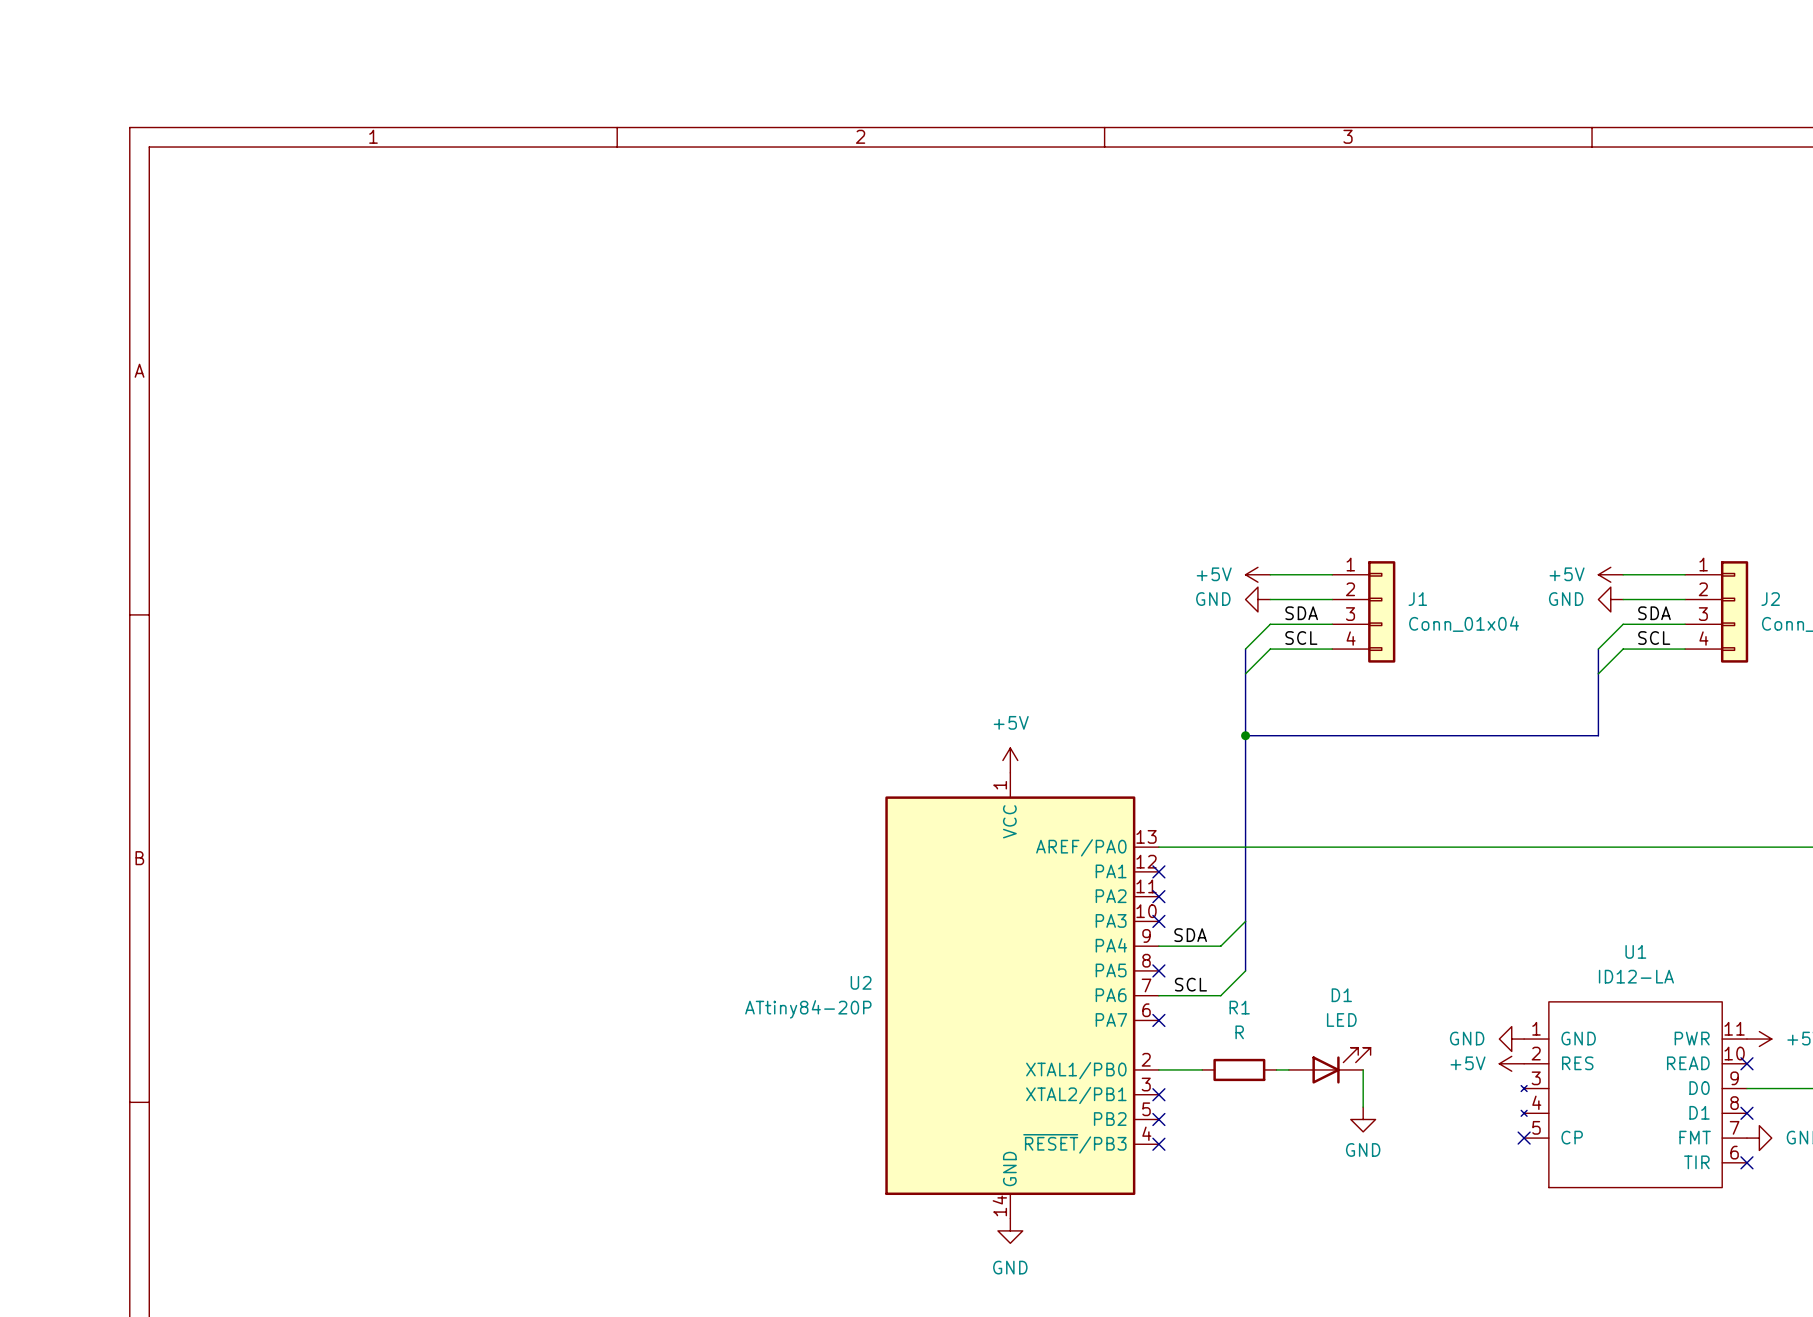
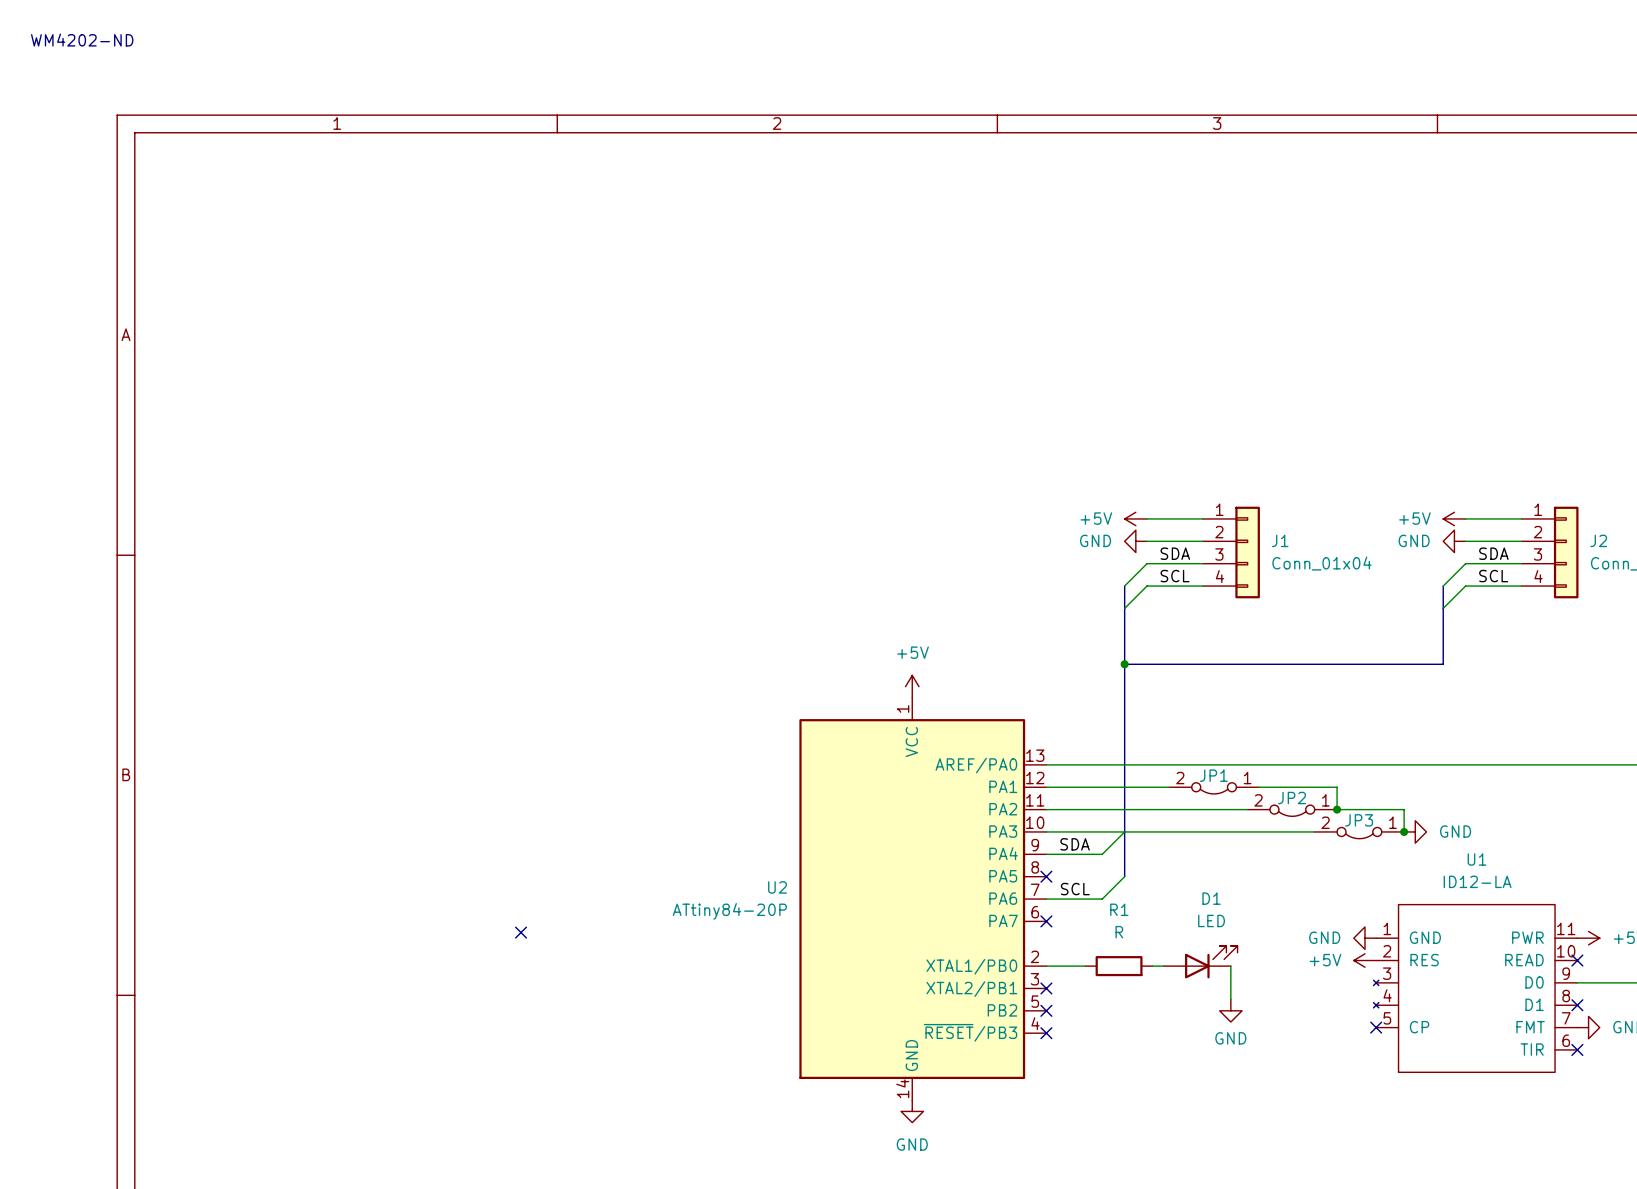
text: none -> WM4202-ND (82, 40)
wire: none -> (1046, 787) (1169, 787)
no-connect mark: (1158, 871) -> none
wire: none -> (1258, 787) (1337, 787) (1337, 809) (1404, 809) (1404, 831)
JP1: none -> (1214, 788)
wire: none -> (1046, 809) (1247, 809)
no-connect mark: (1158, 896) -> none
junction: none -> (1337, 809)
JP2: none -> (1292, 810)
wire: none -> (1046, 831) (1314, 831)
no-connect mark: (1158, 921) -> none
junction: none -> (1404, 831)
power symbol: none -> GND (1415, 831)
JP3: none -> (1359, 833)
no-connect mark: none -> (521, 932)

